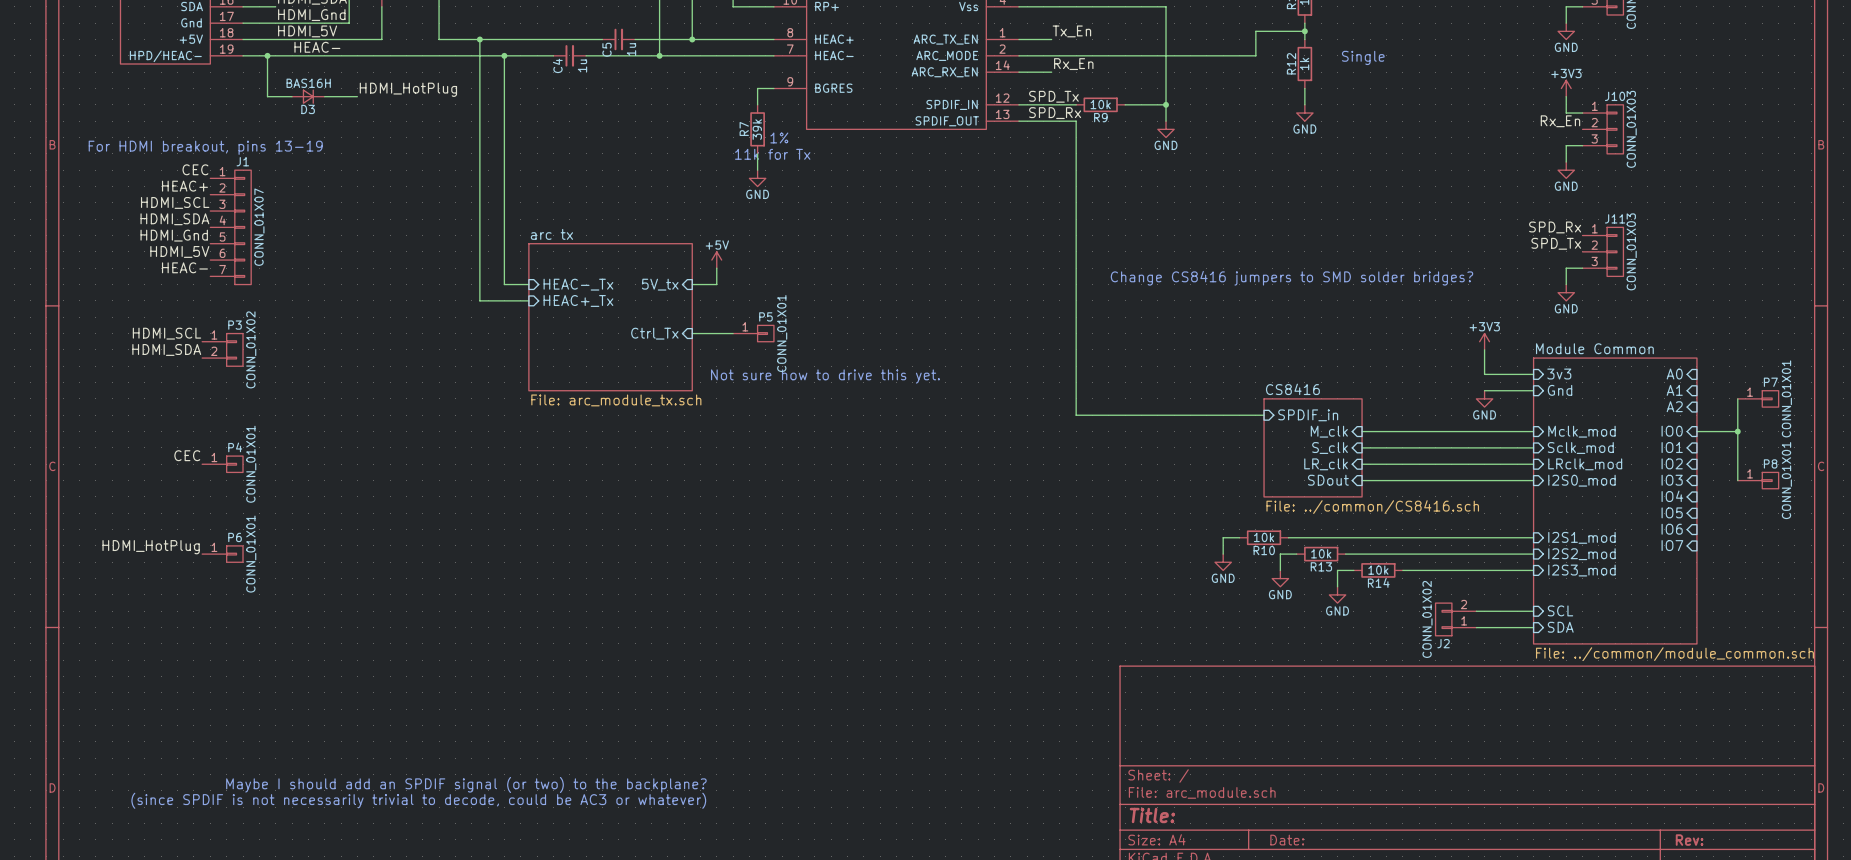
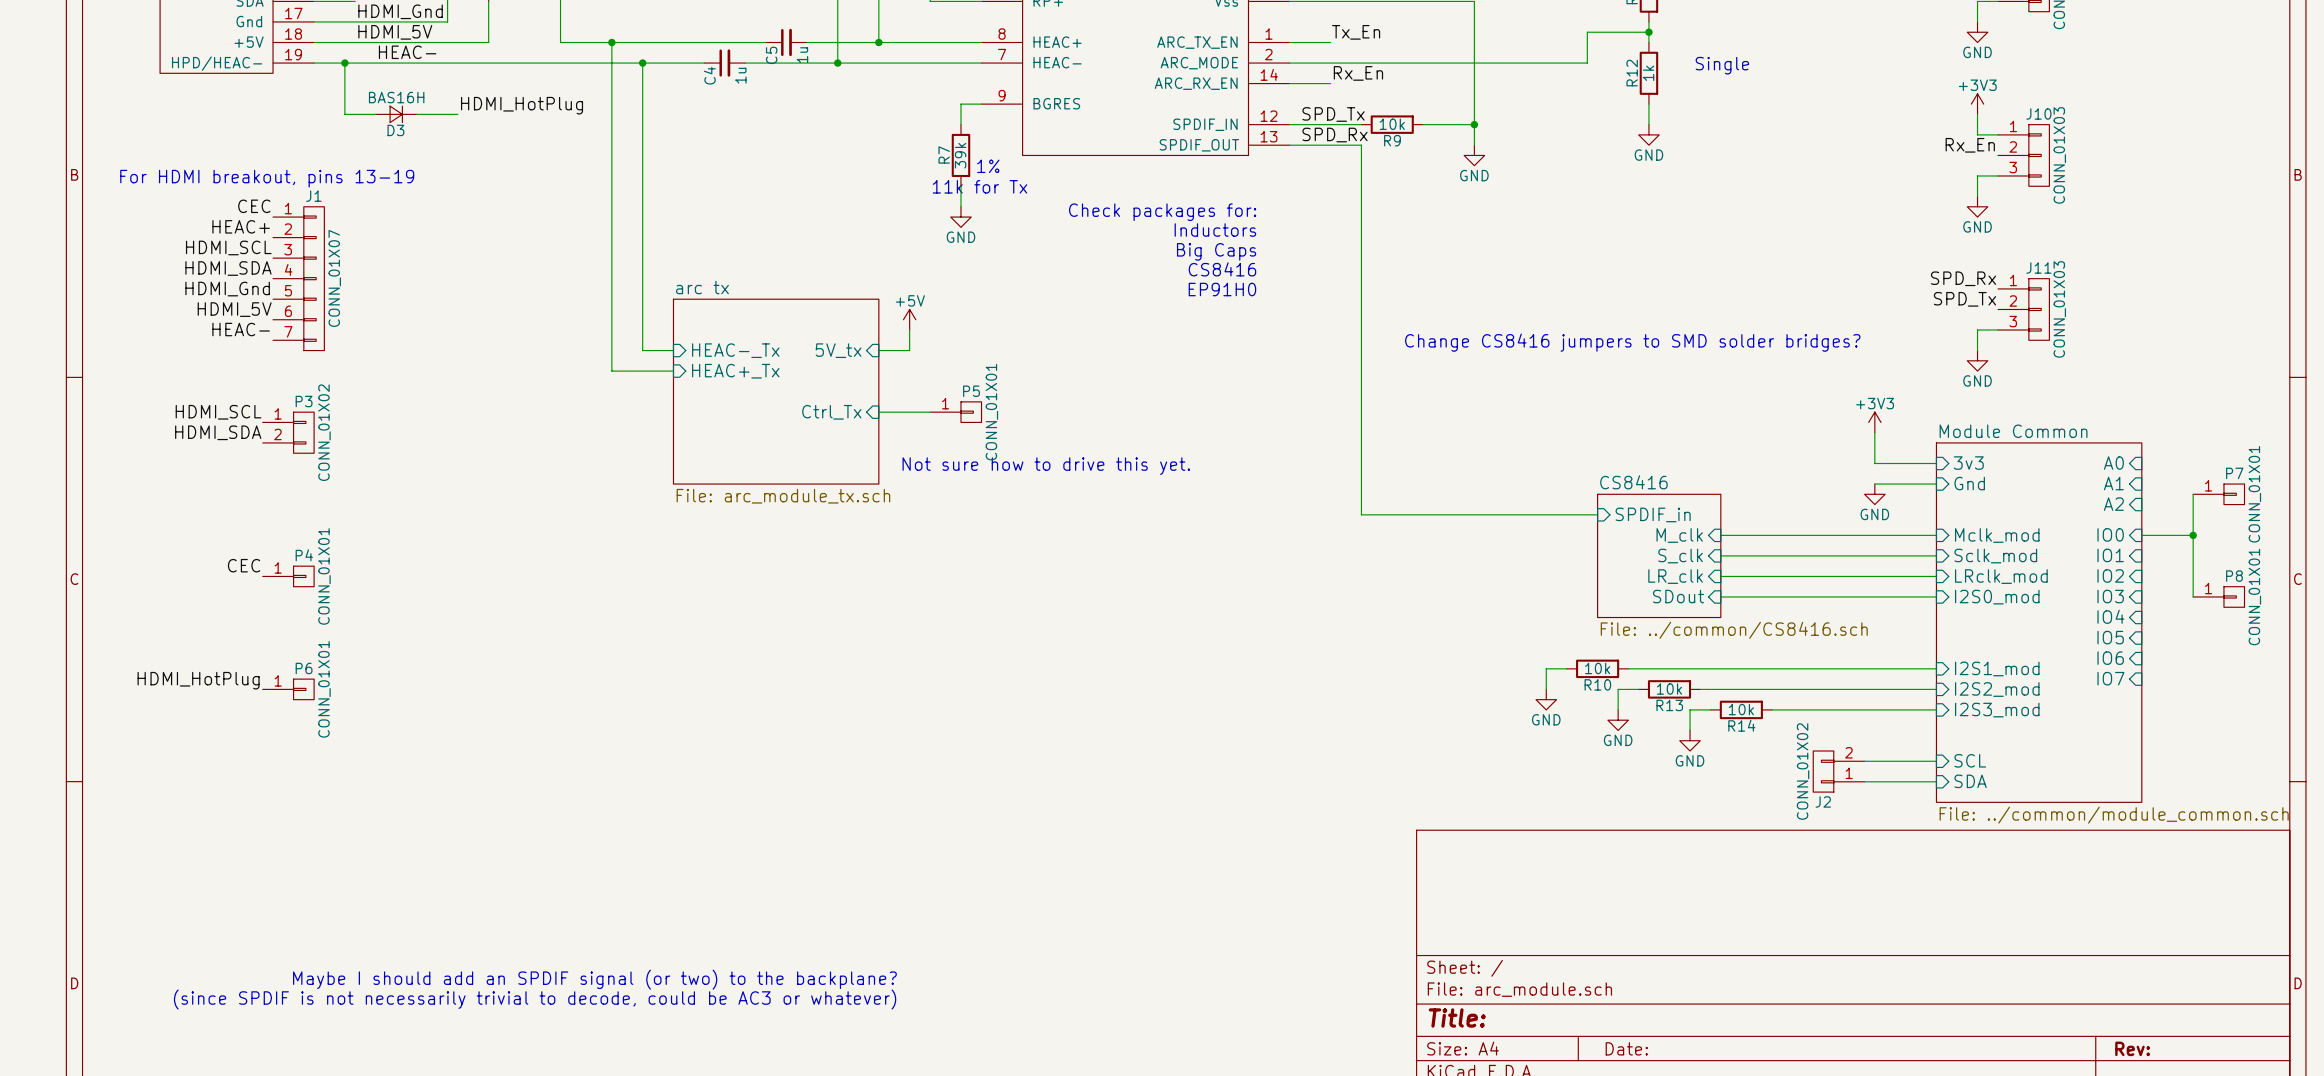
text: none -> Check packages for: (1162, 212)
text: none -> Inductors (1215, 230)
text: none -> Big Caps (1216, 251)
text: none -> CS8416 (1222, 269)
text: none -> EP91H0 (1222, 289)

